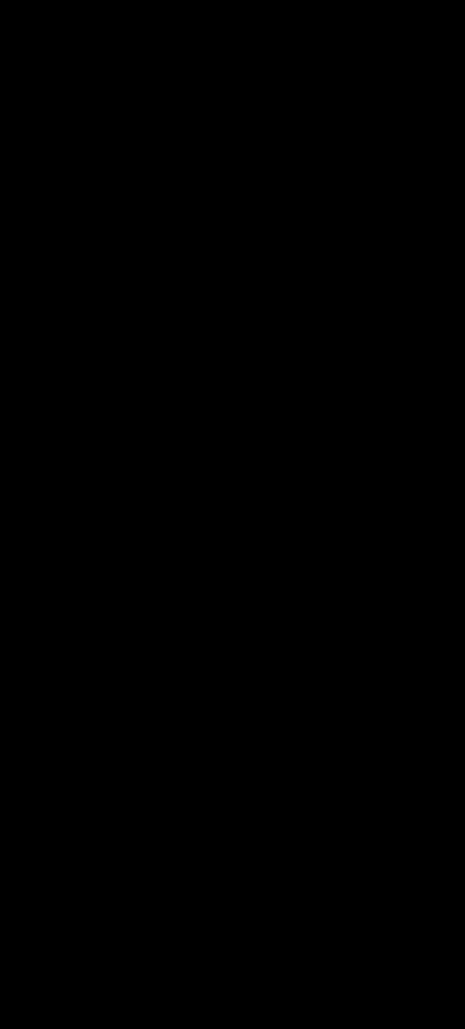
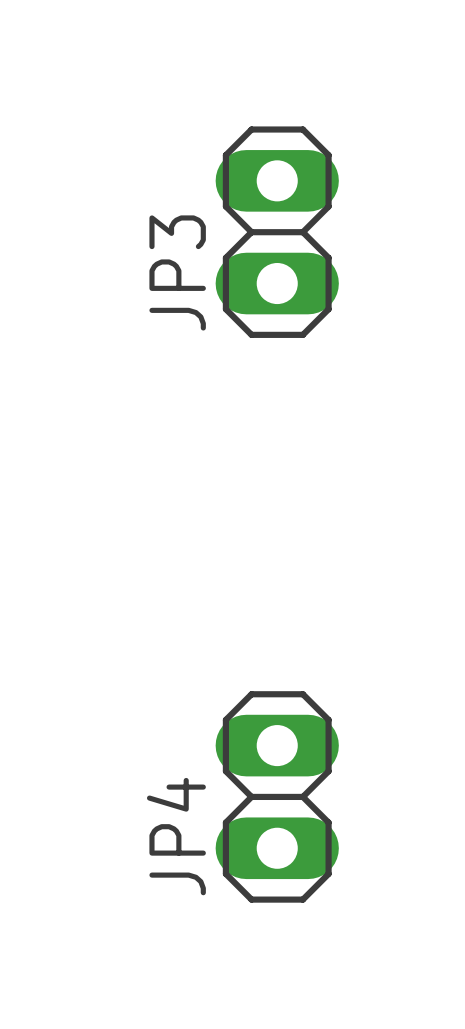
JP3: none -> (277, 232)
JP4: none -> (277, 796)

